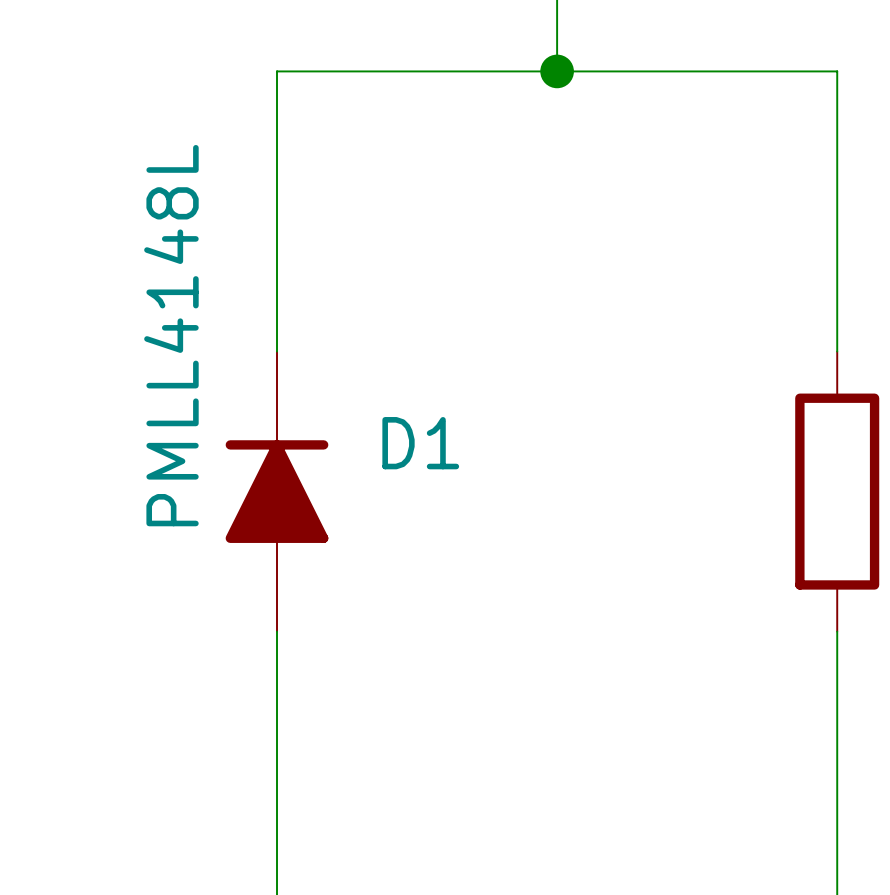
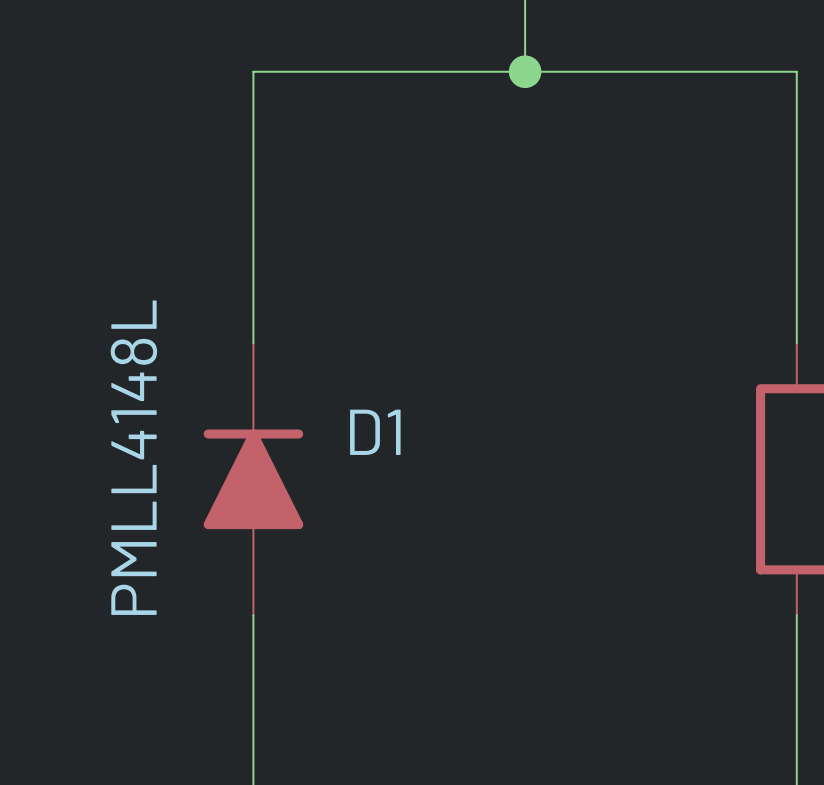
D1 value position: PMLL4148L (171, 335) -> PMLL4148L (133, 457)

